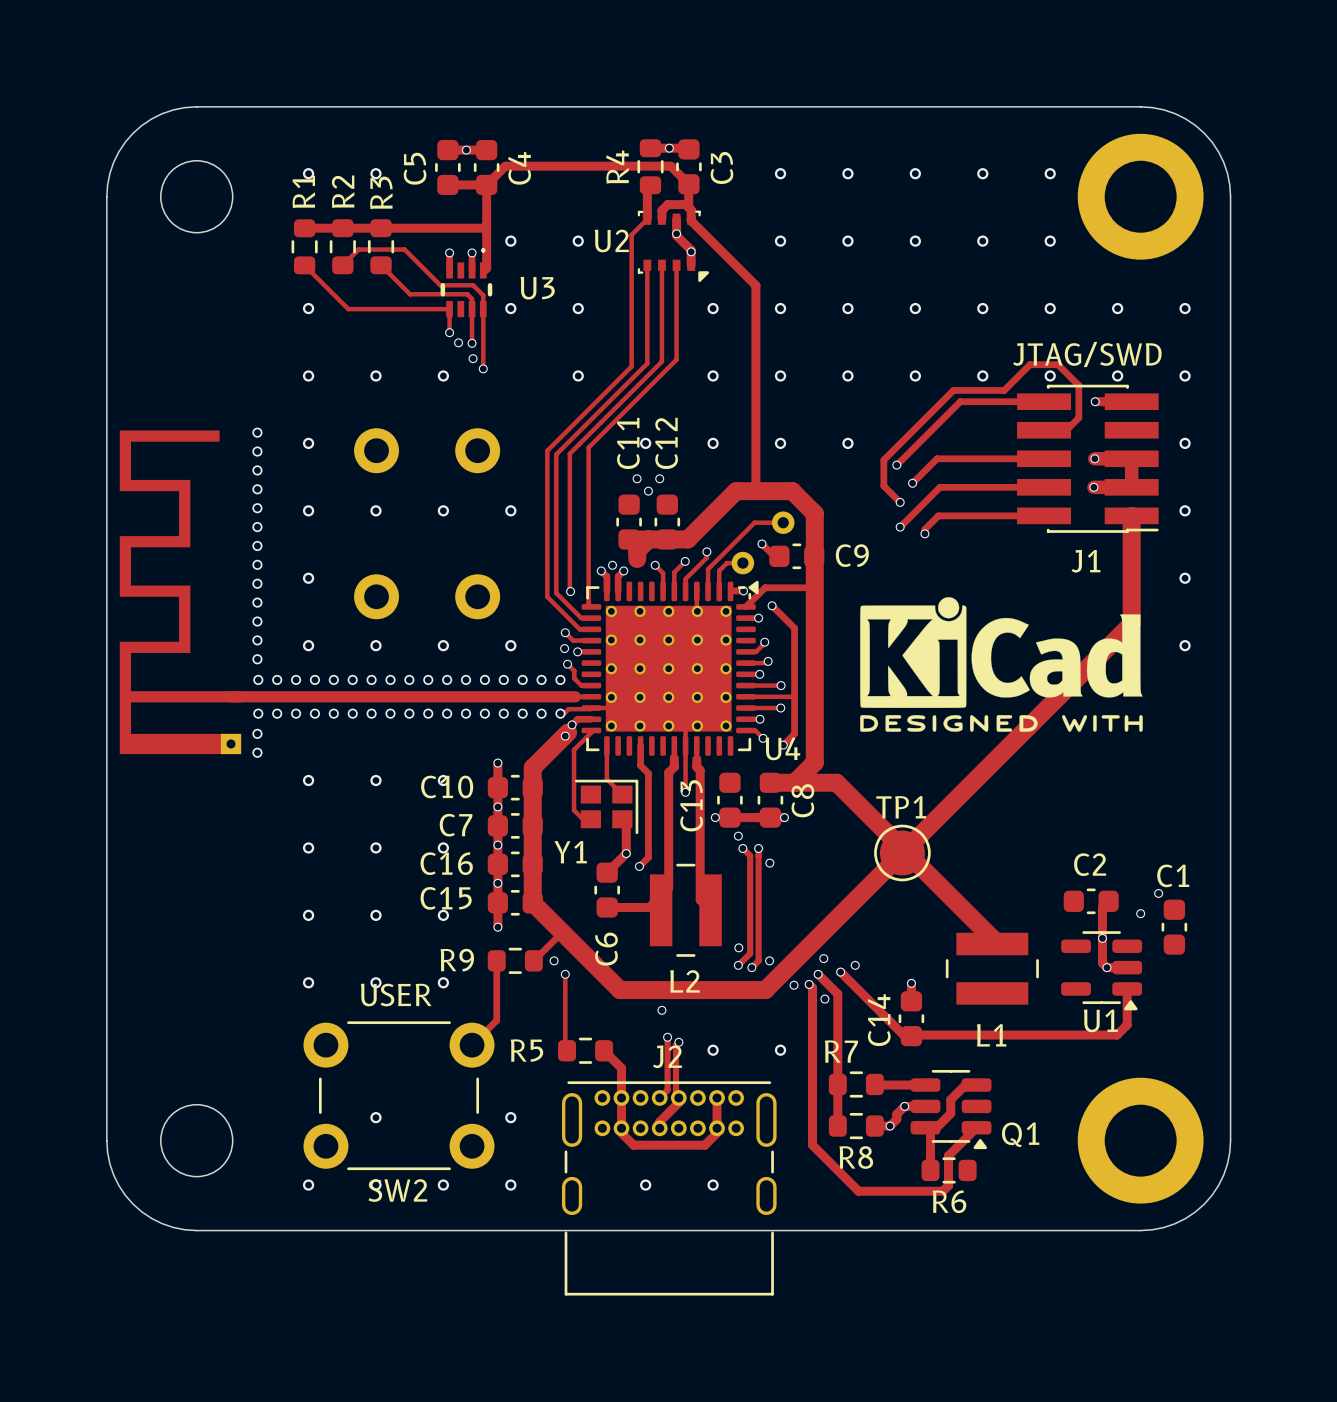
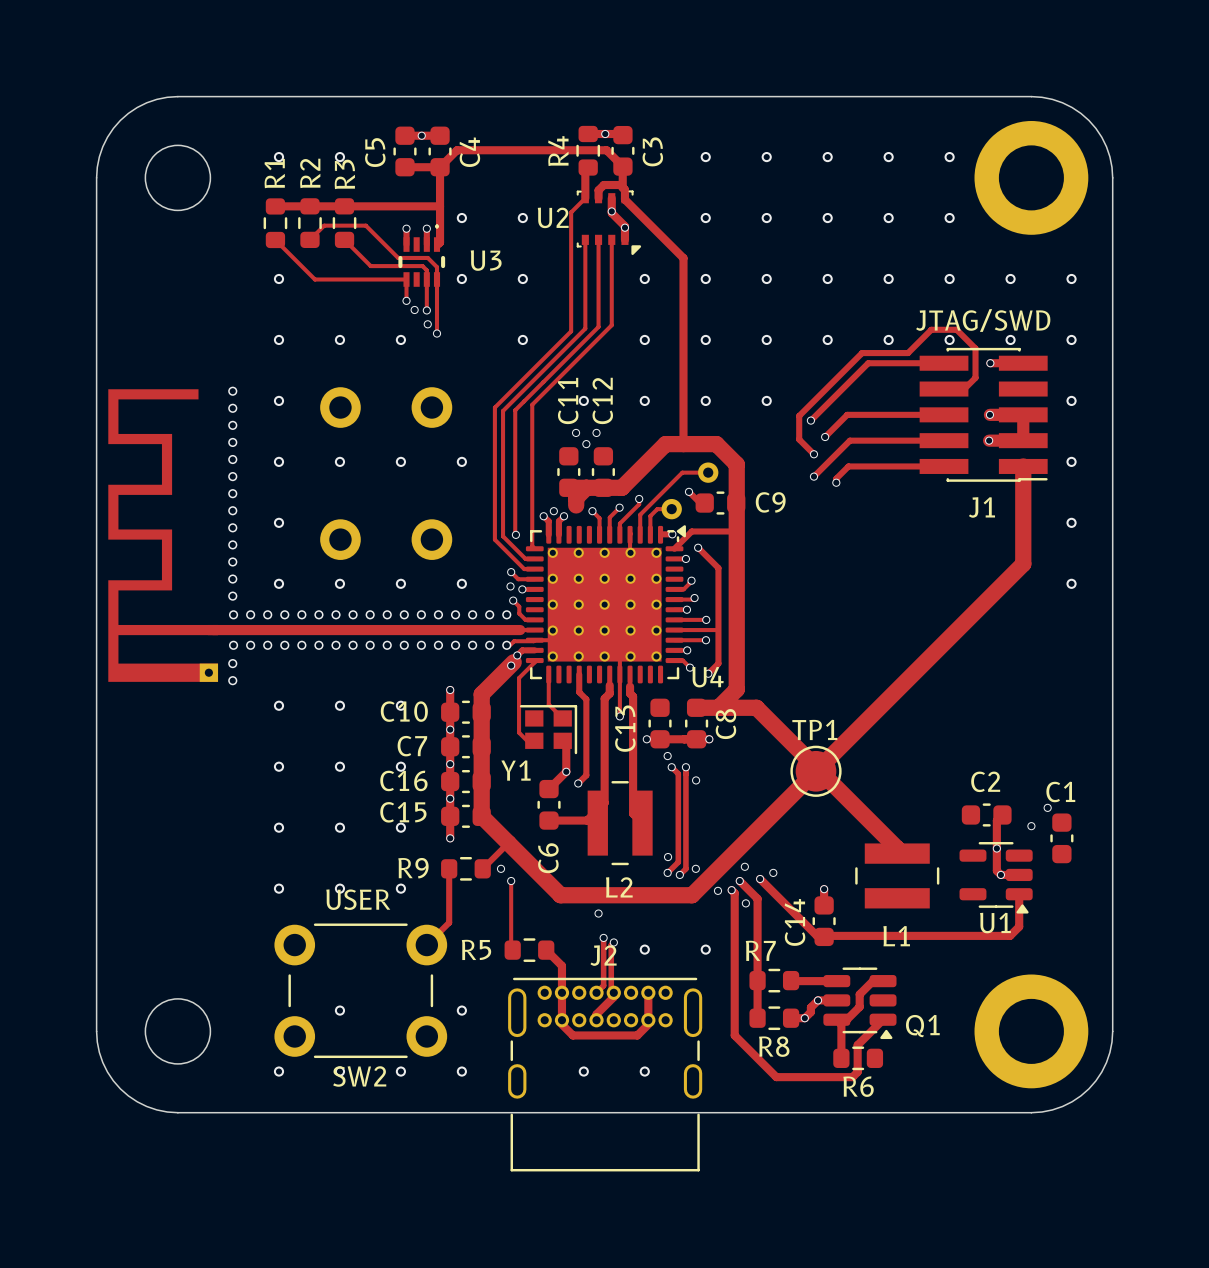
drawing: [860, 597, 1143, 732] -> none

